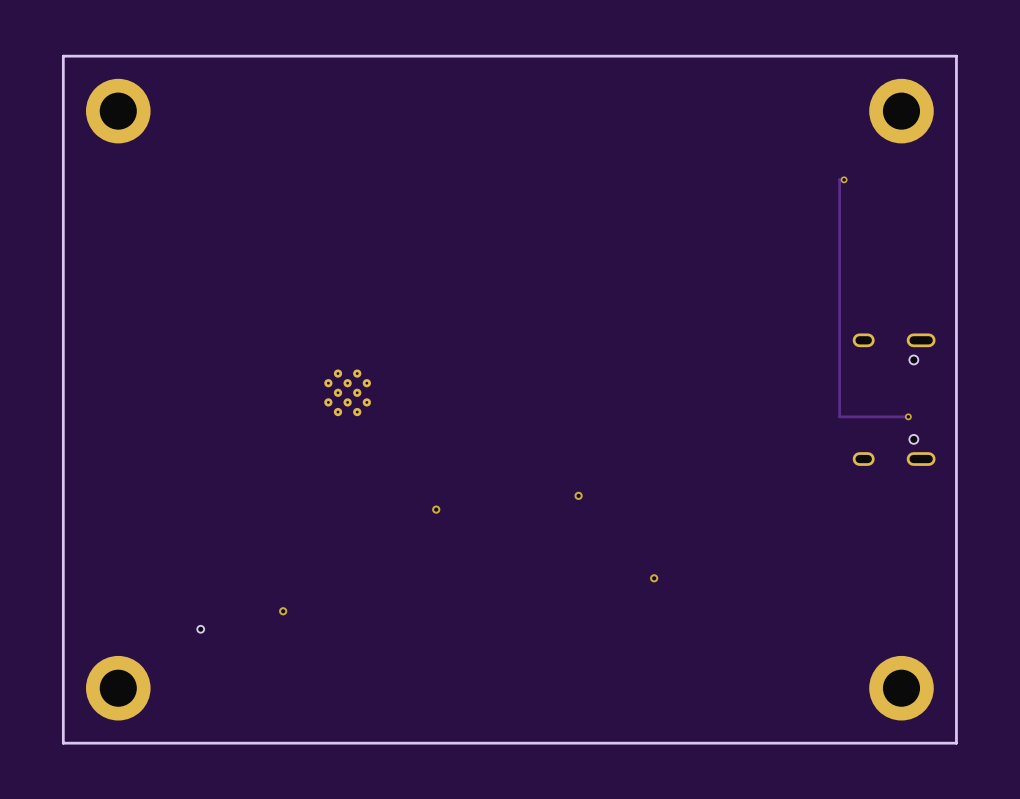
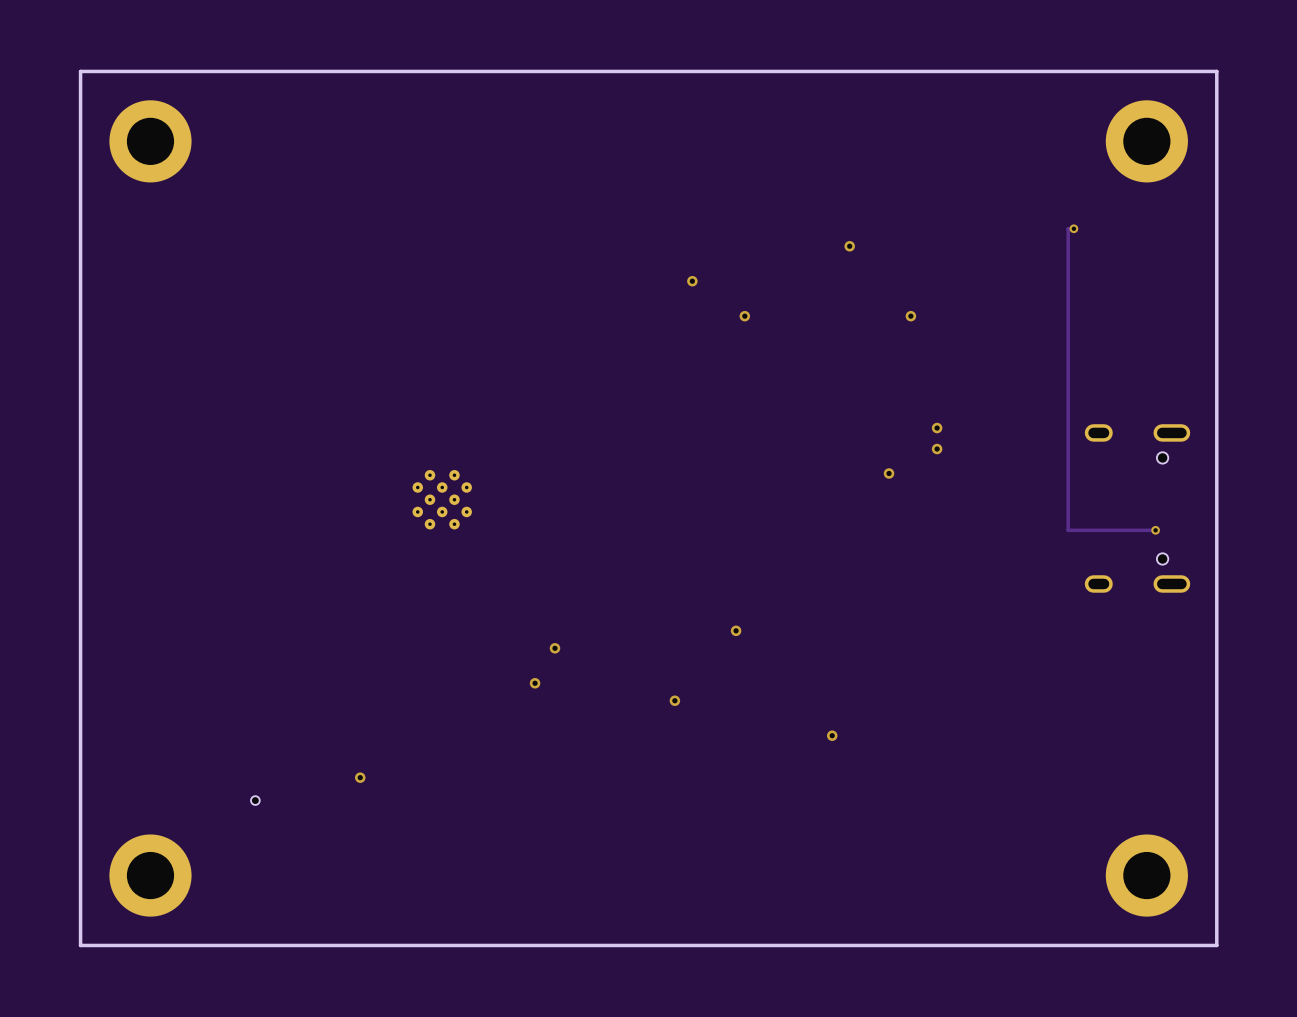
via: none -> (849, 246)
via: none -> (692, 281)
via: none -> (744, 316)
via: none -> (910, 316)
via: none -> (937, 428)
via: none -> (937, 449)
via: none -> (889, 473)
via: none -> (535, 683)
via: none -> (674, 700)

